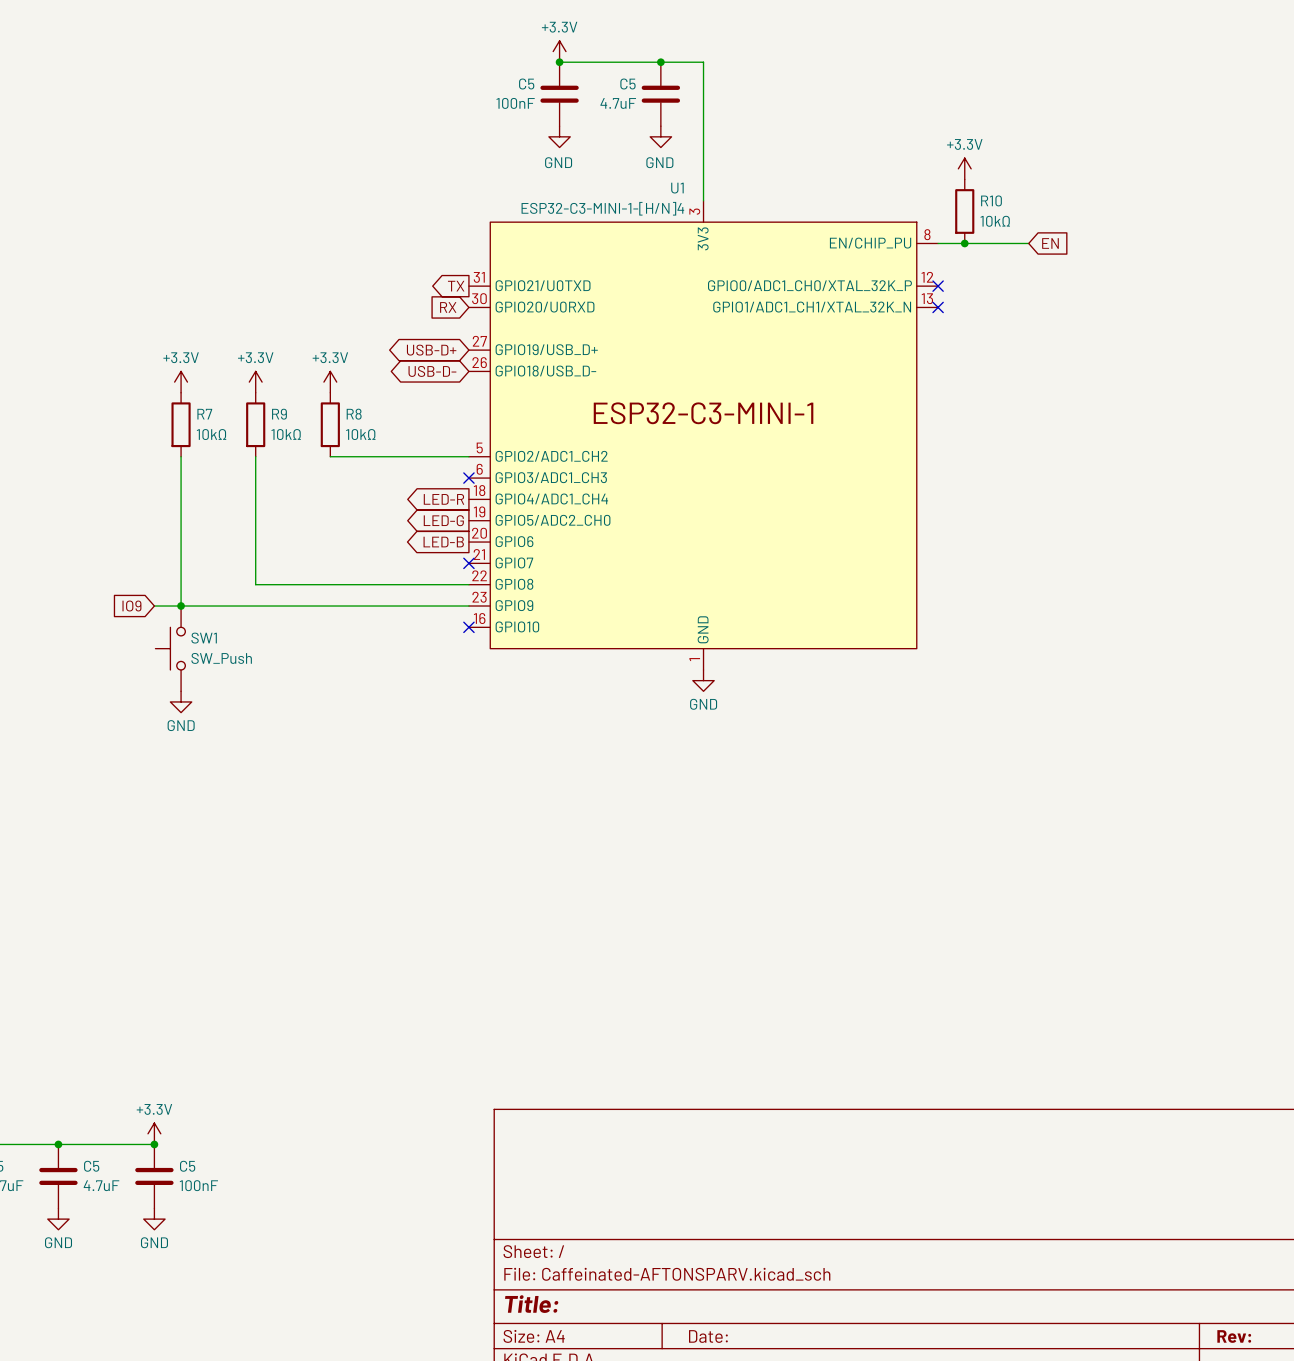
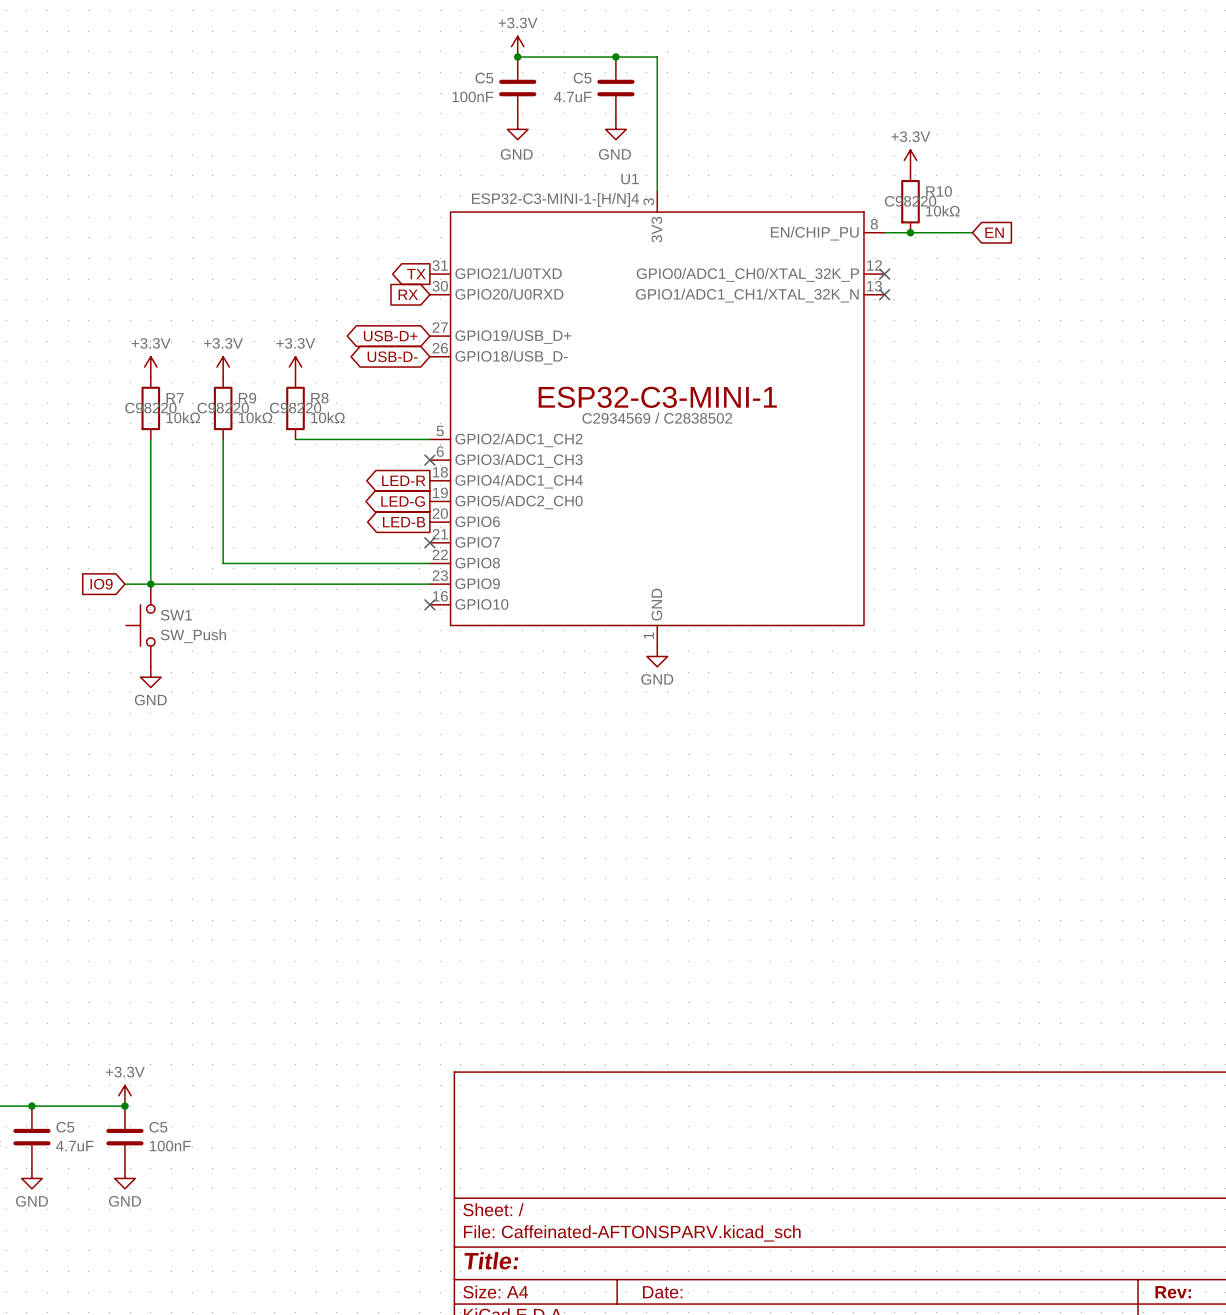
R10 text: none -> C98220 (910, 201)
R7 text: none -> C98220 (150, 408)
R9 text: none -> C98220 (223, 408)
R8 text: none -> C98220 (295, 408)
U1 text: none -> C2934569 / C2838502 (657, 418)

